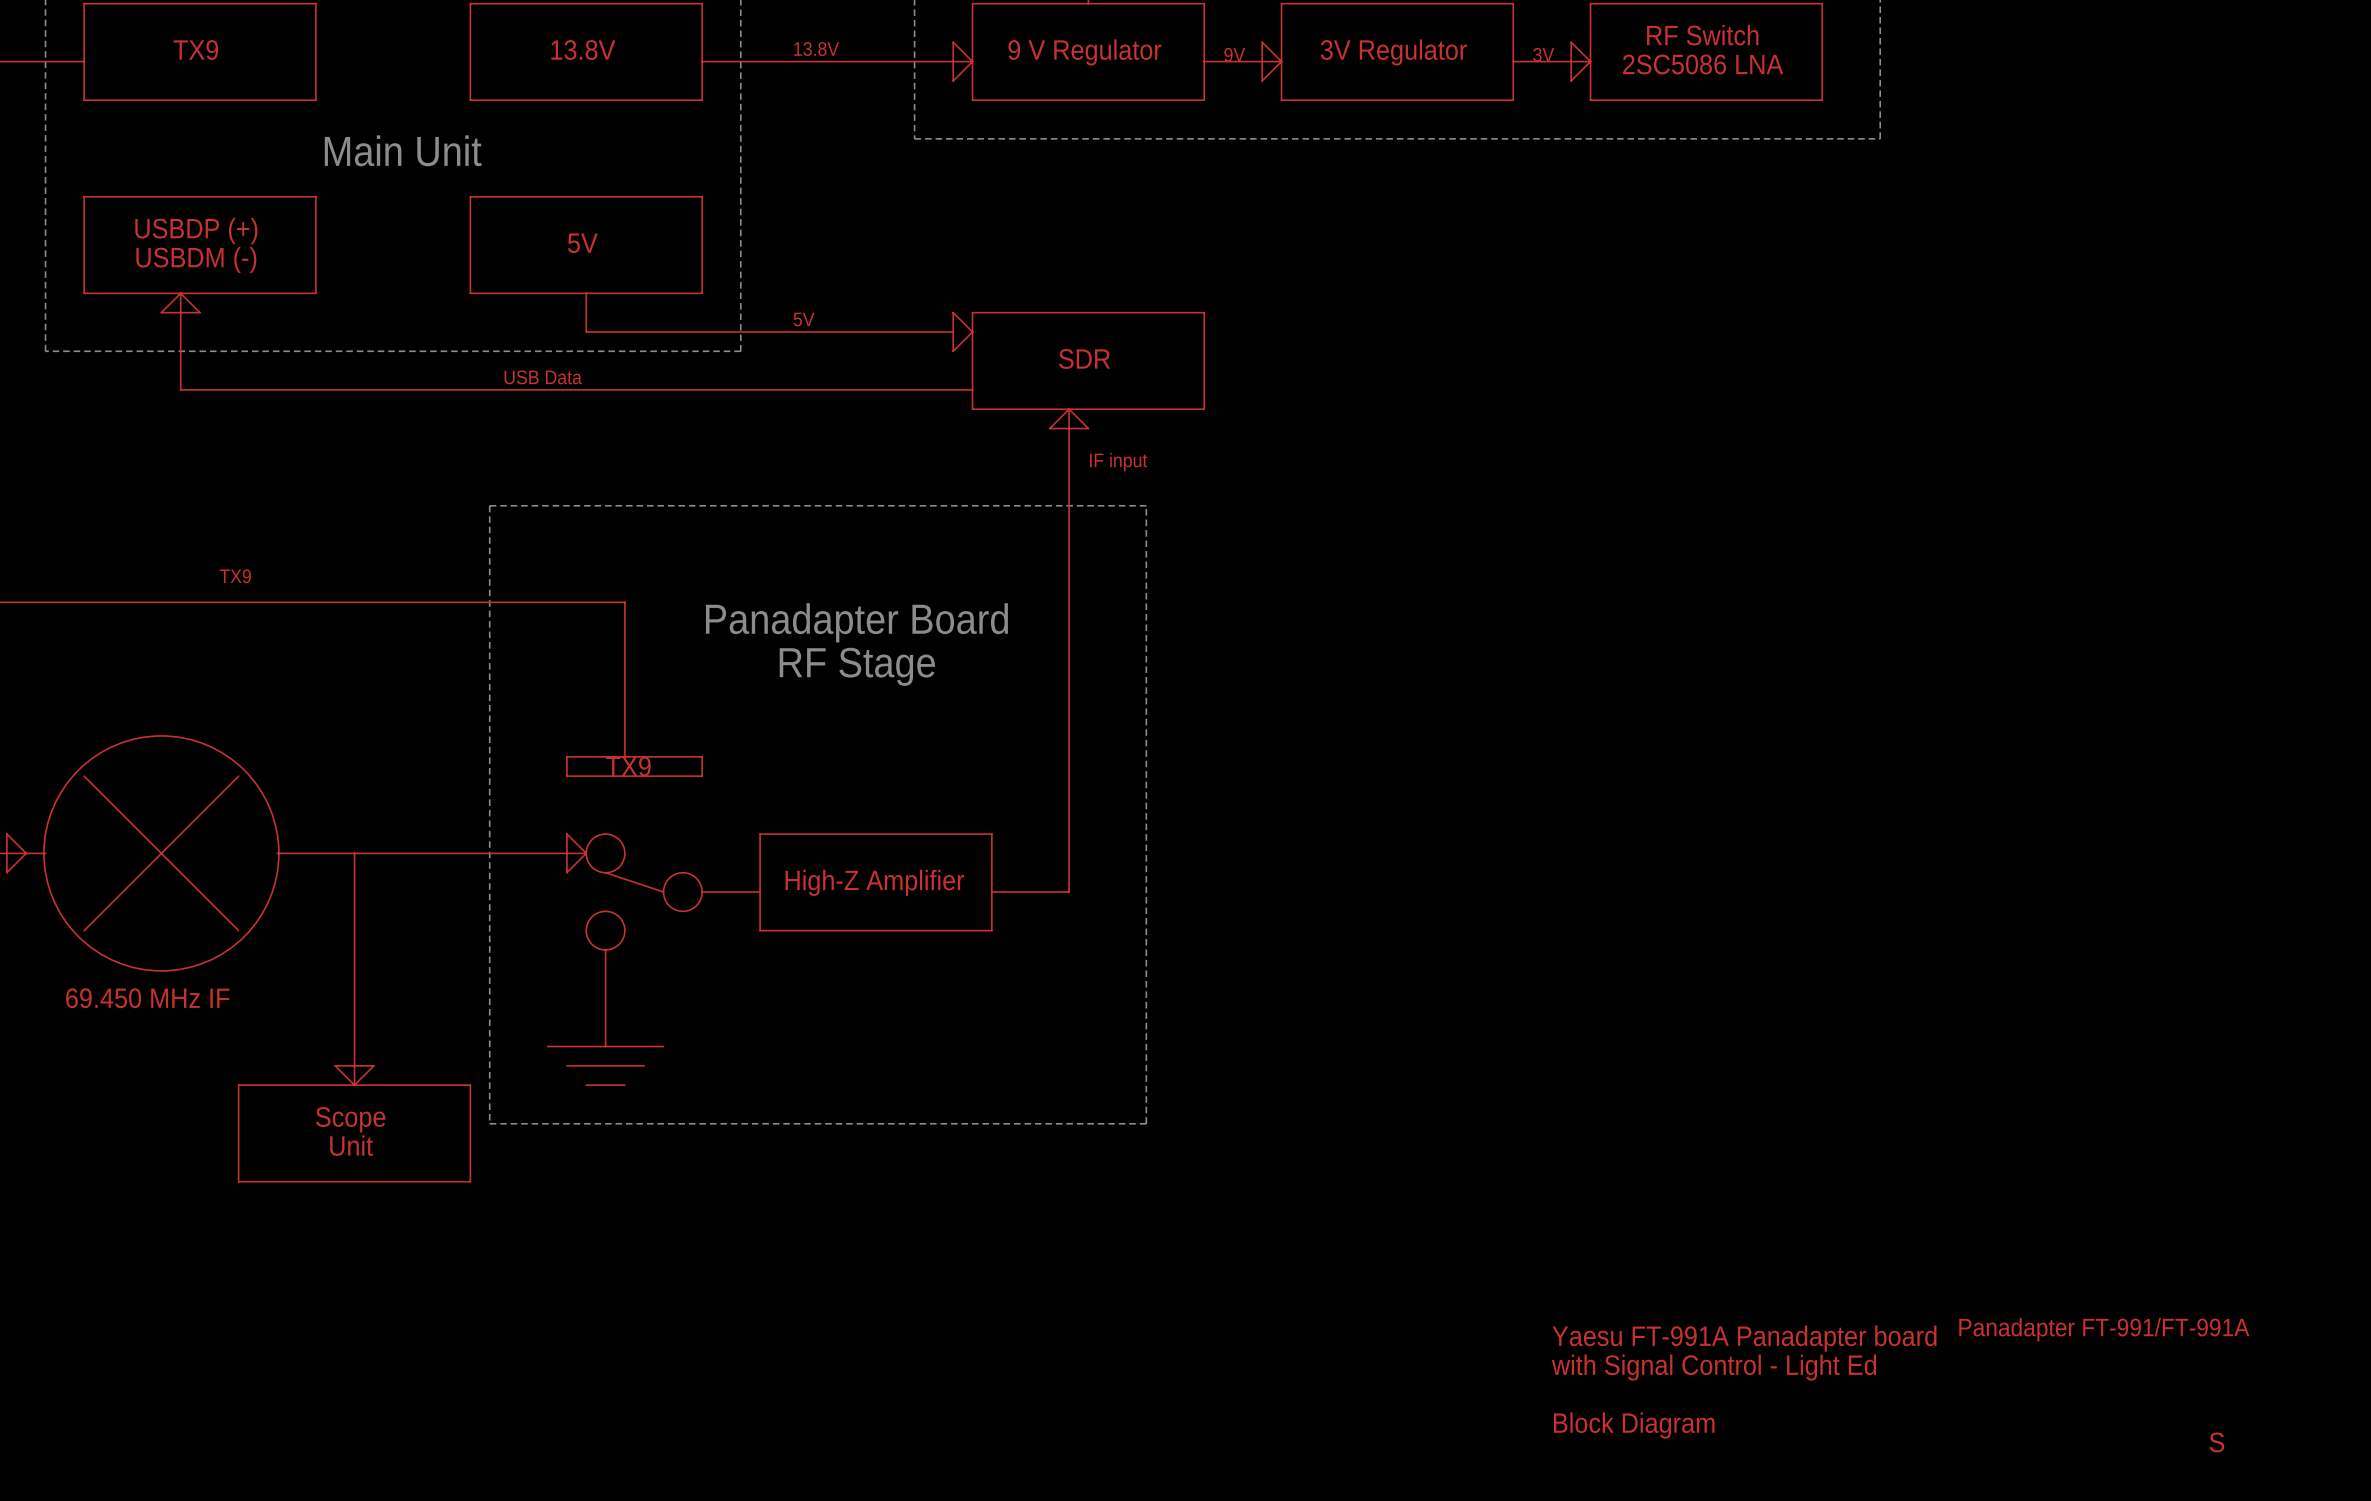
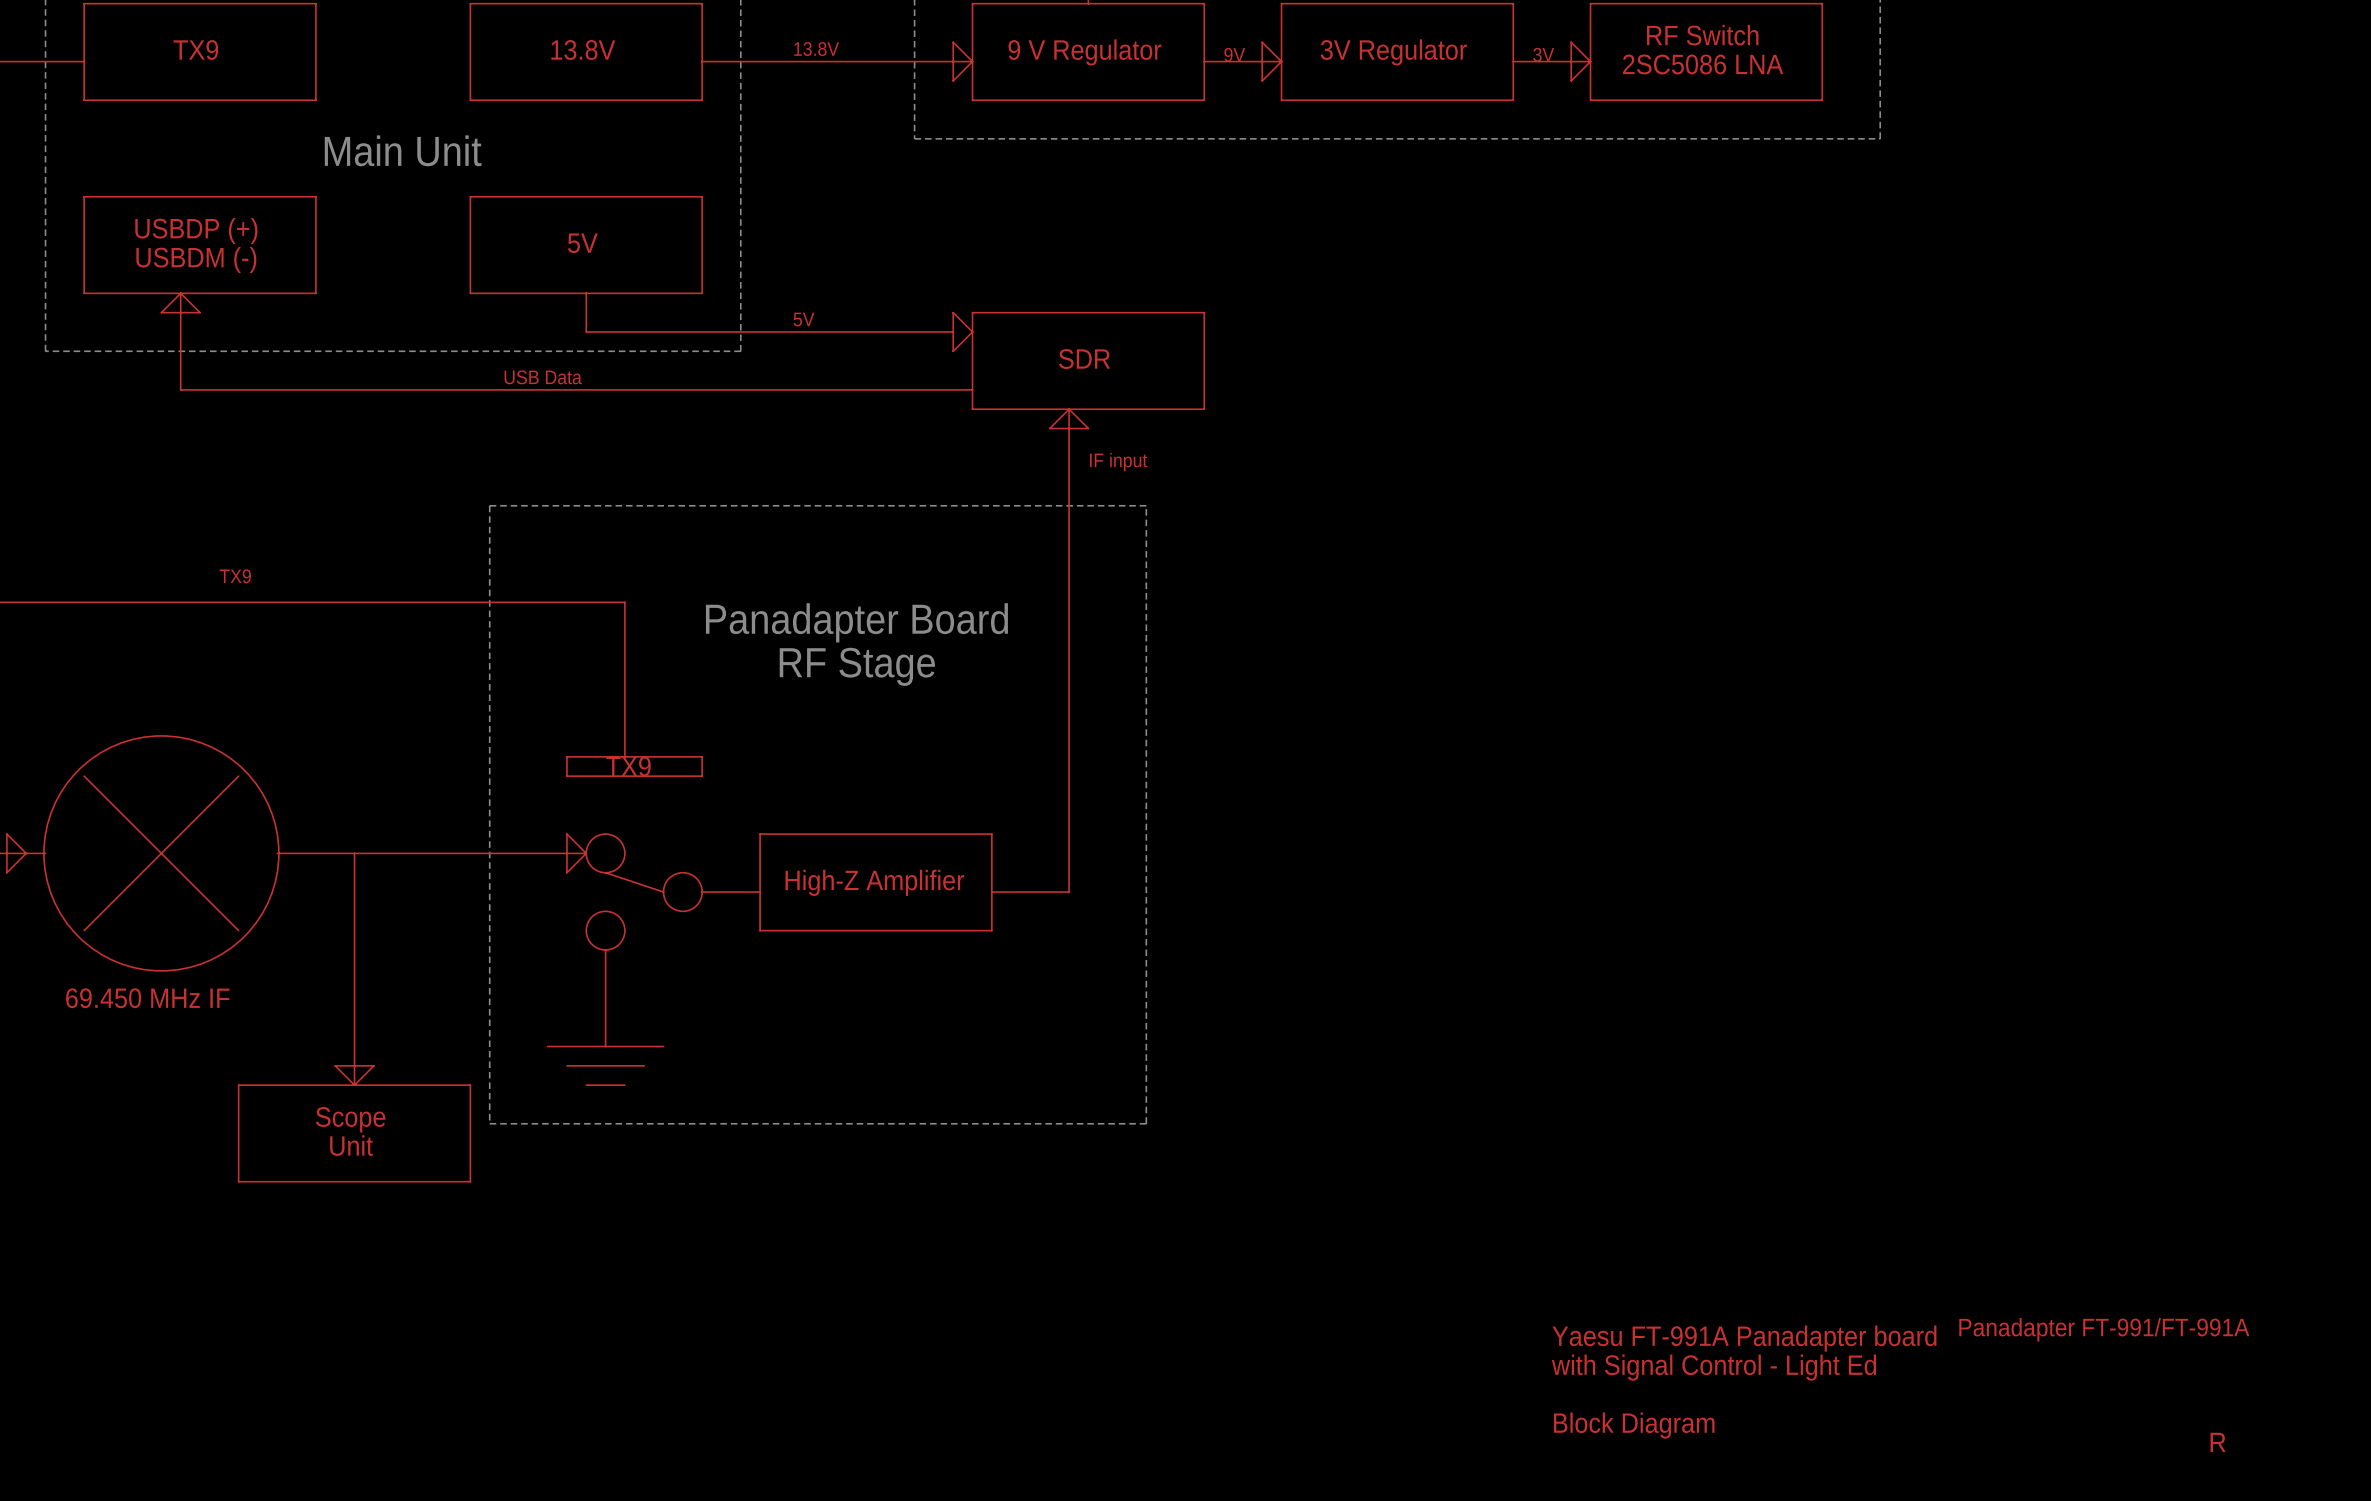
text: S (2216, 1442) -> R (2218, 1442)

